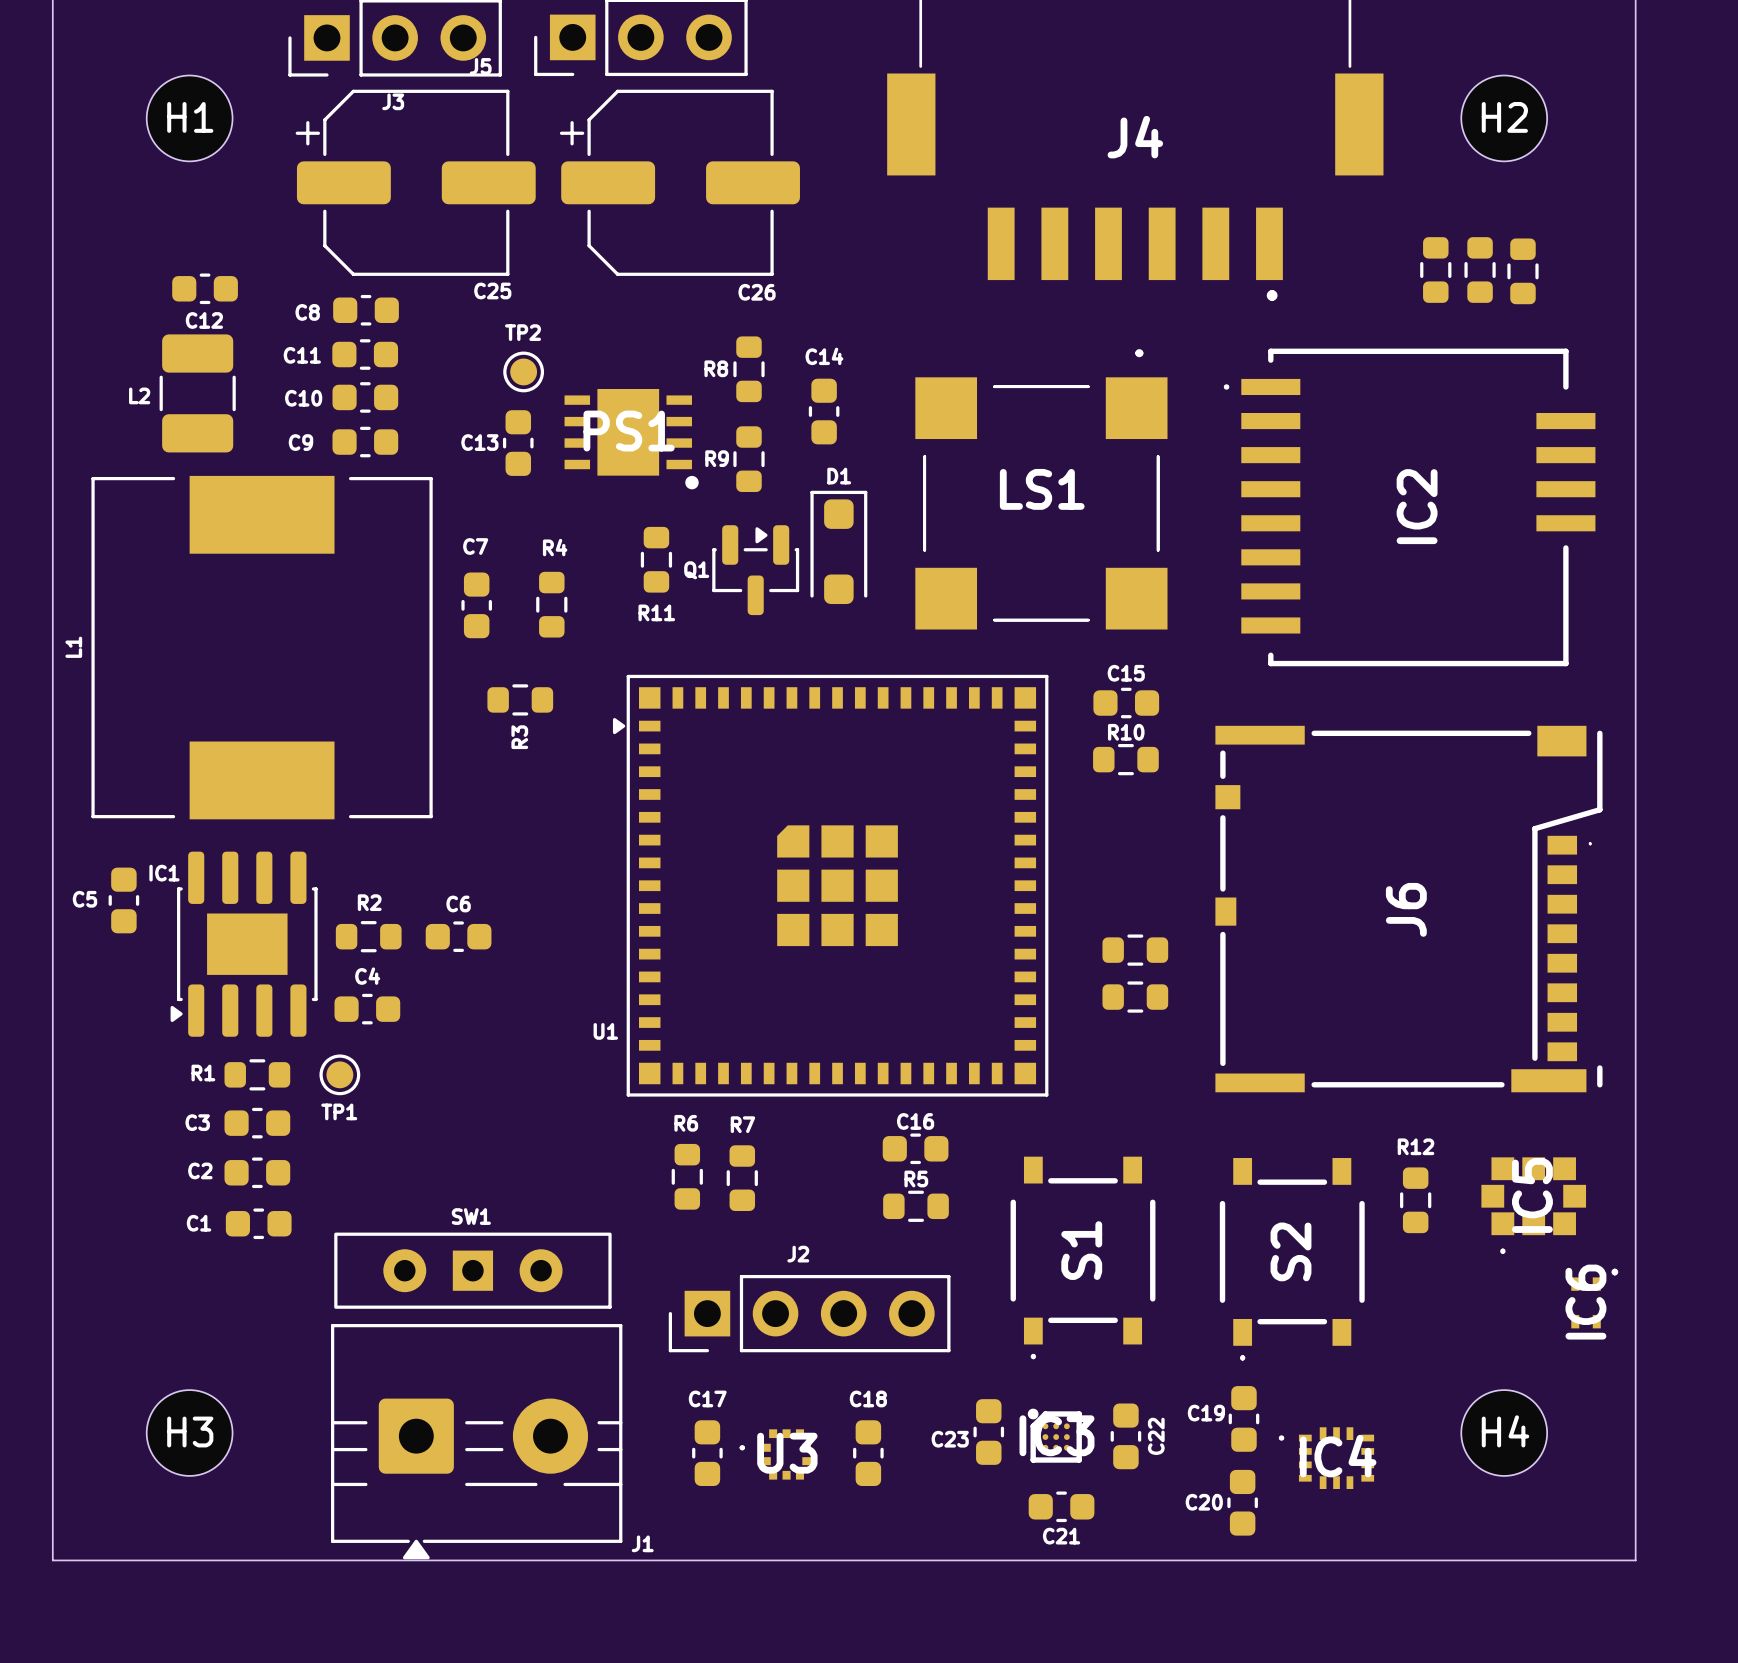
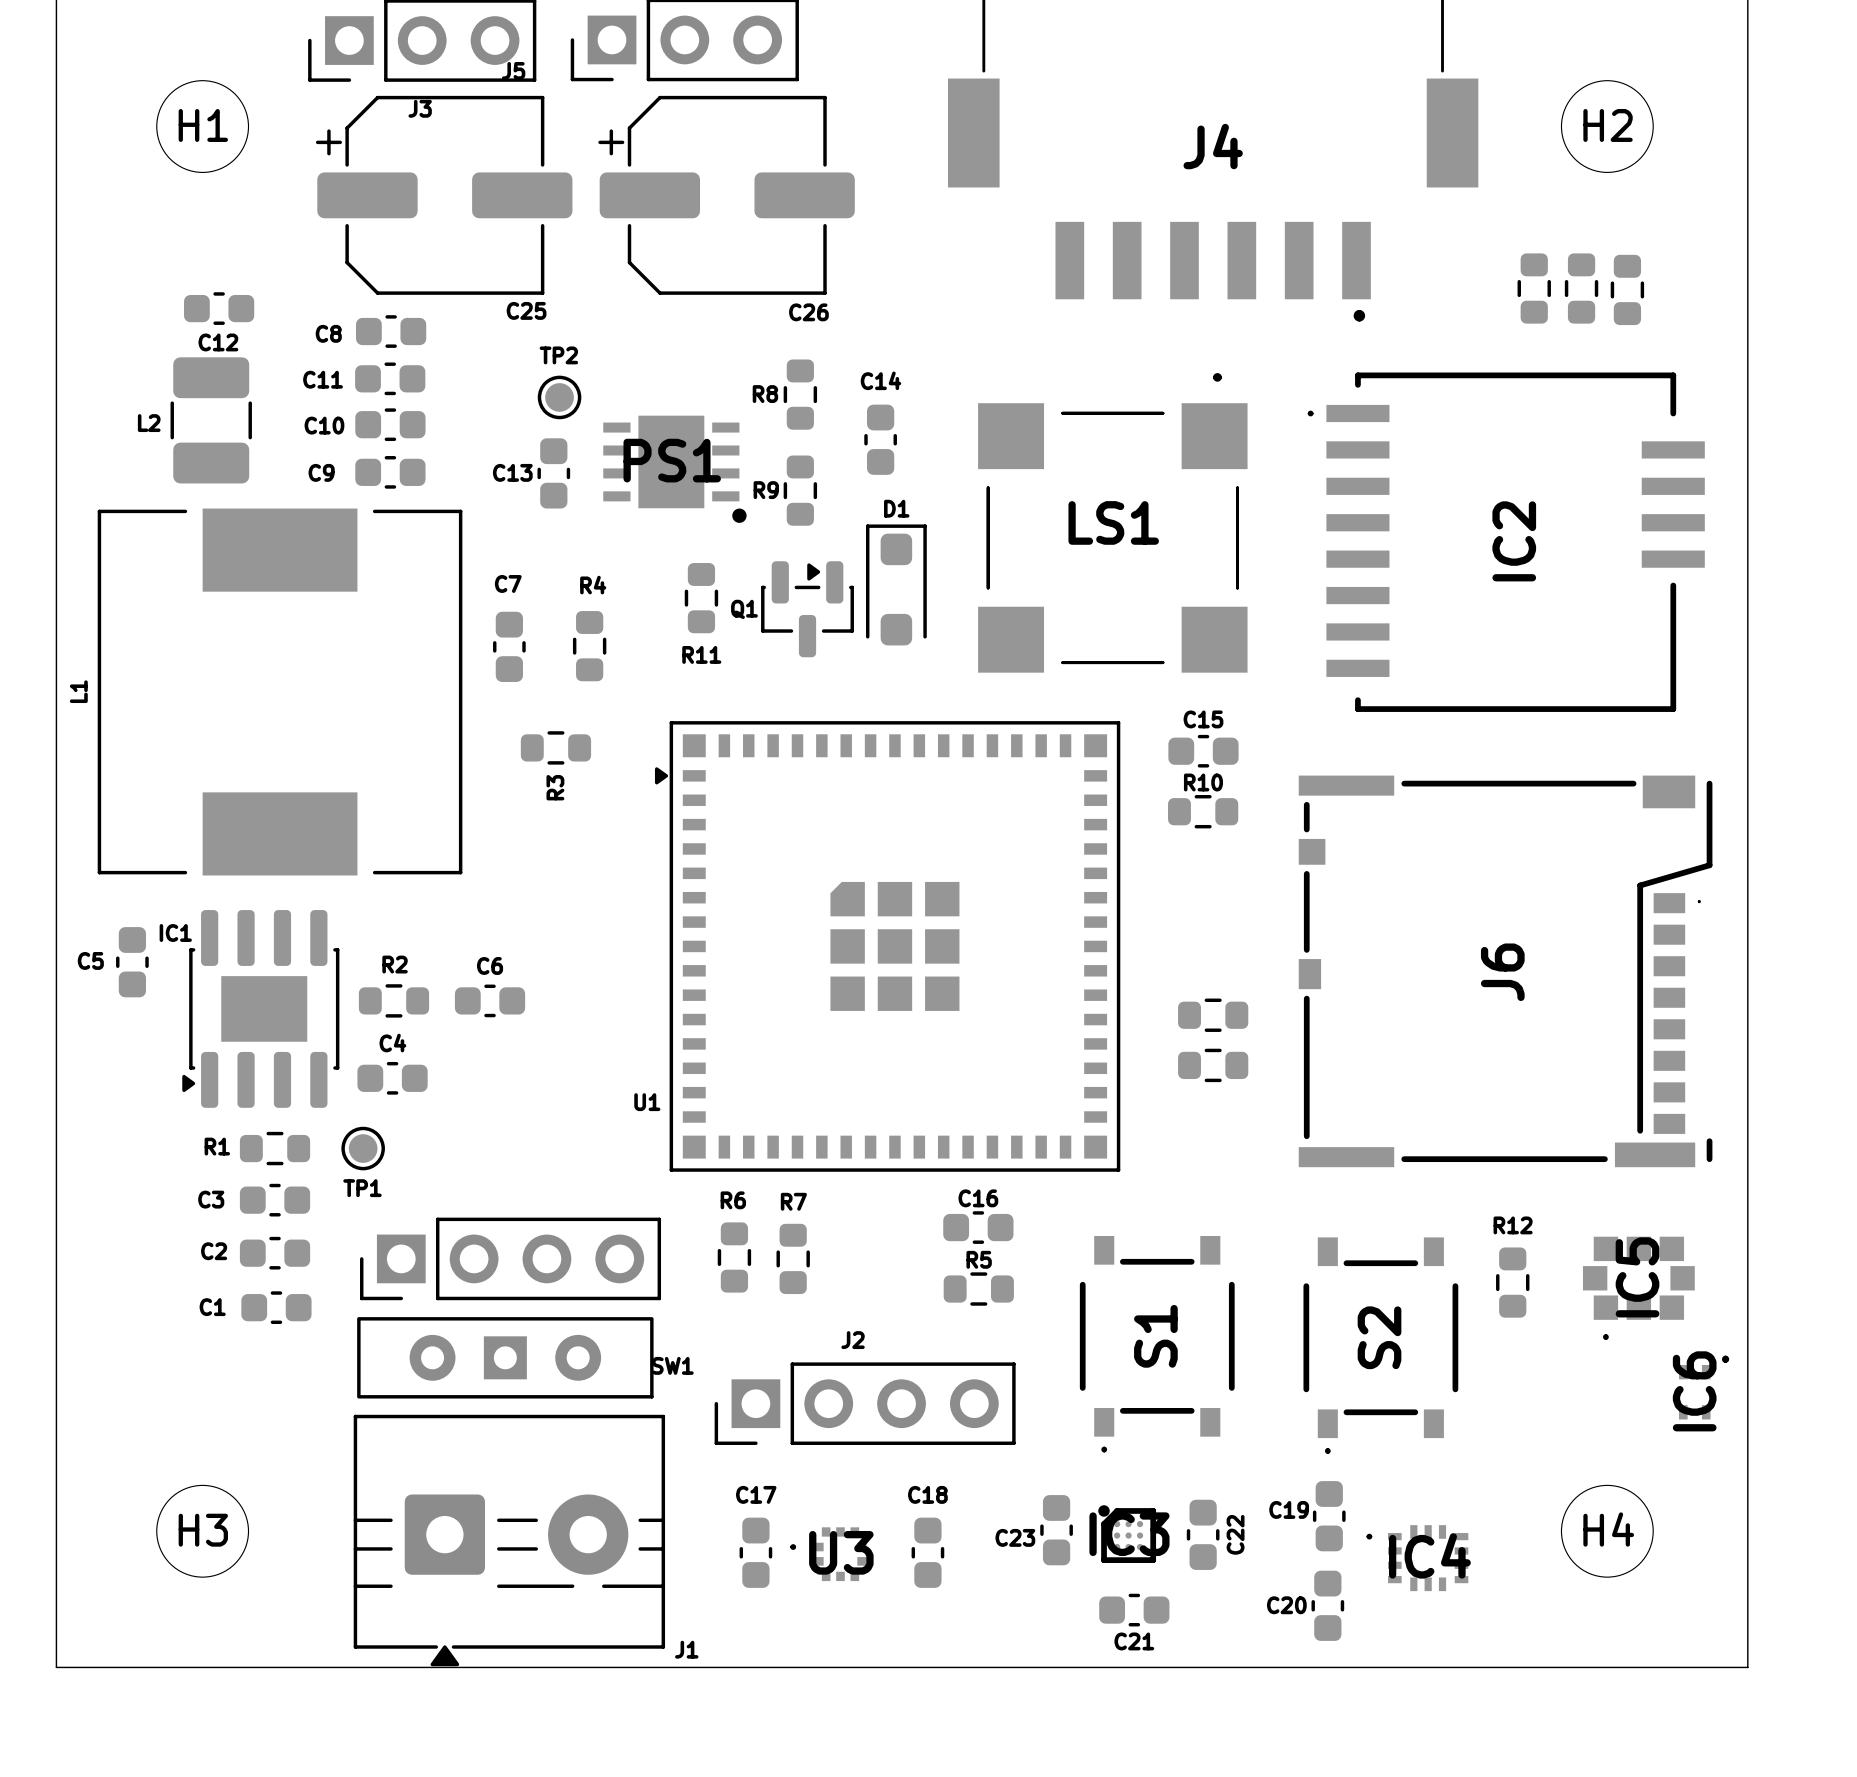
part: none -> (510, 1258)
SW1 name position: SW1 (471, 1216) -> SW1 (672, 1365)

